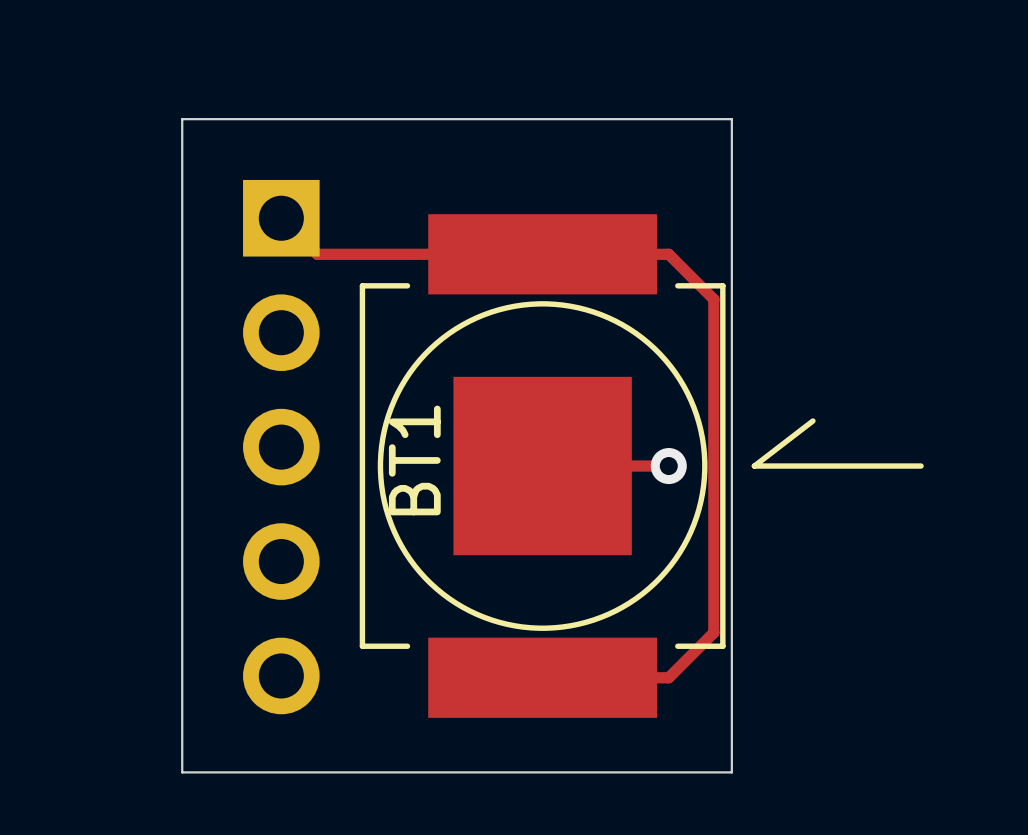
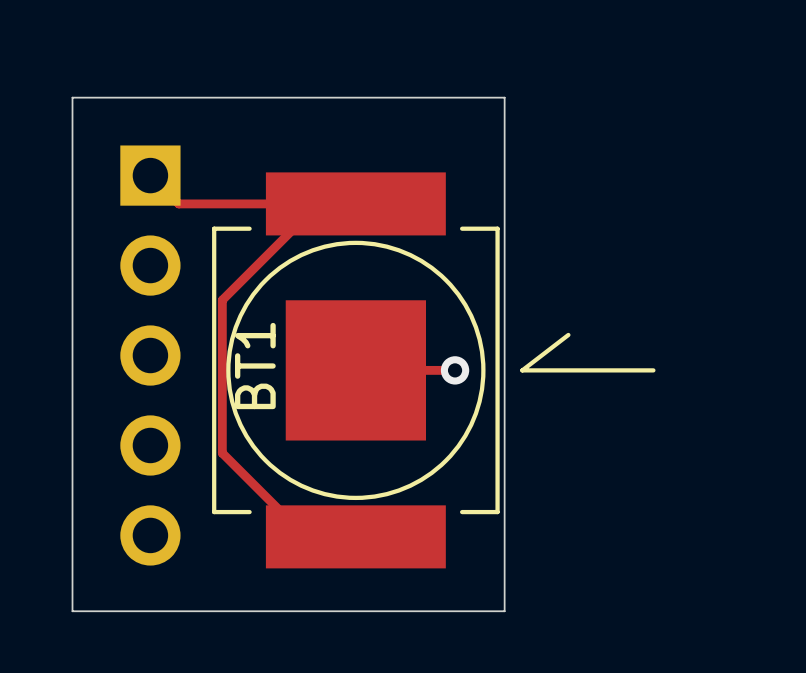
track: (542, 254) (668, 254) (713, 299) (713, 632) (668, 677) (542, 677) -> (318, 203) (222, 300) (222, 453) (306, 536) (355, 536)

